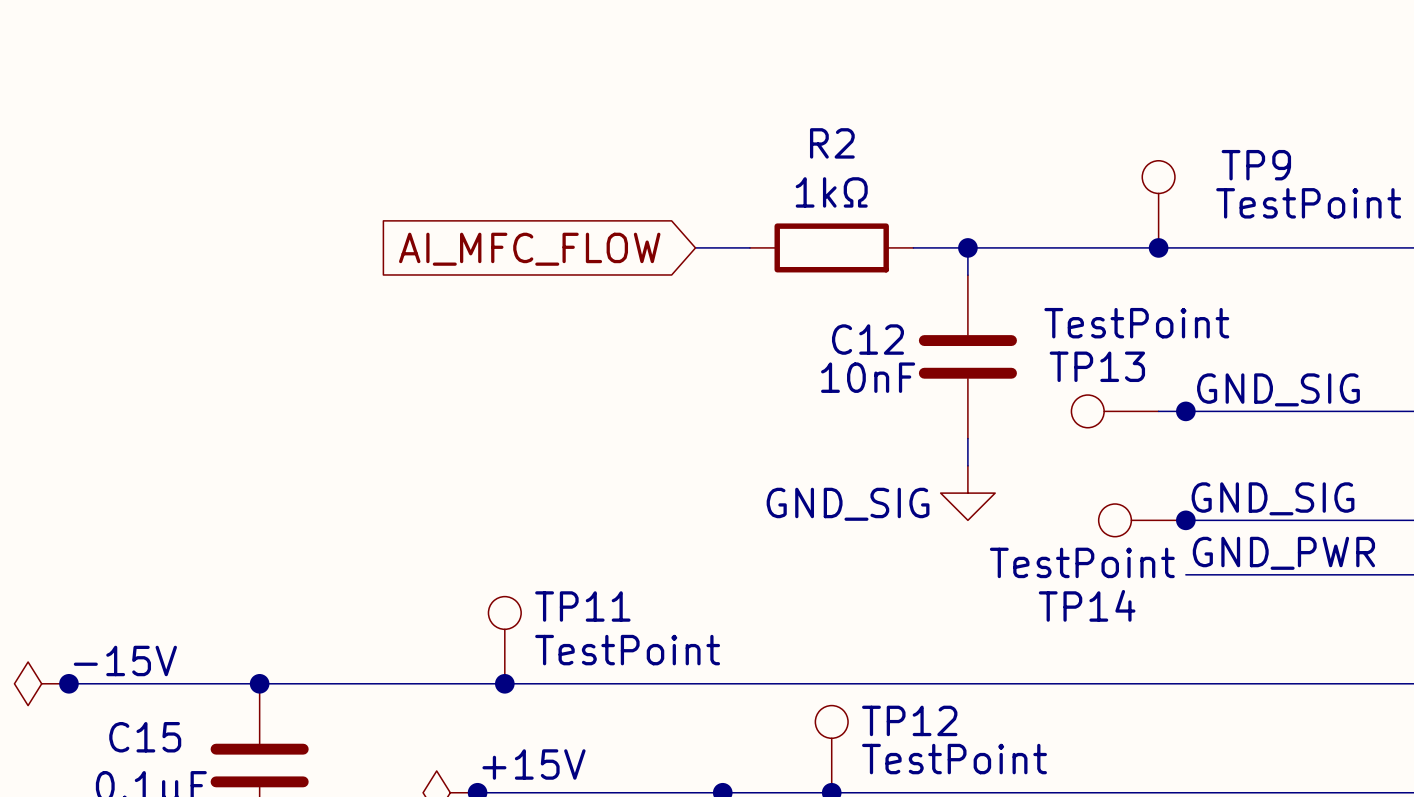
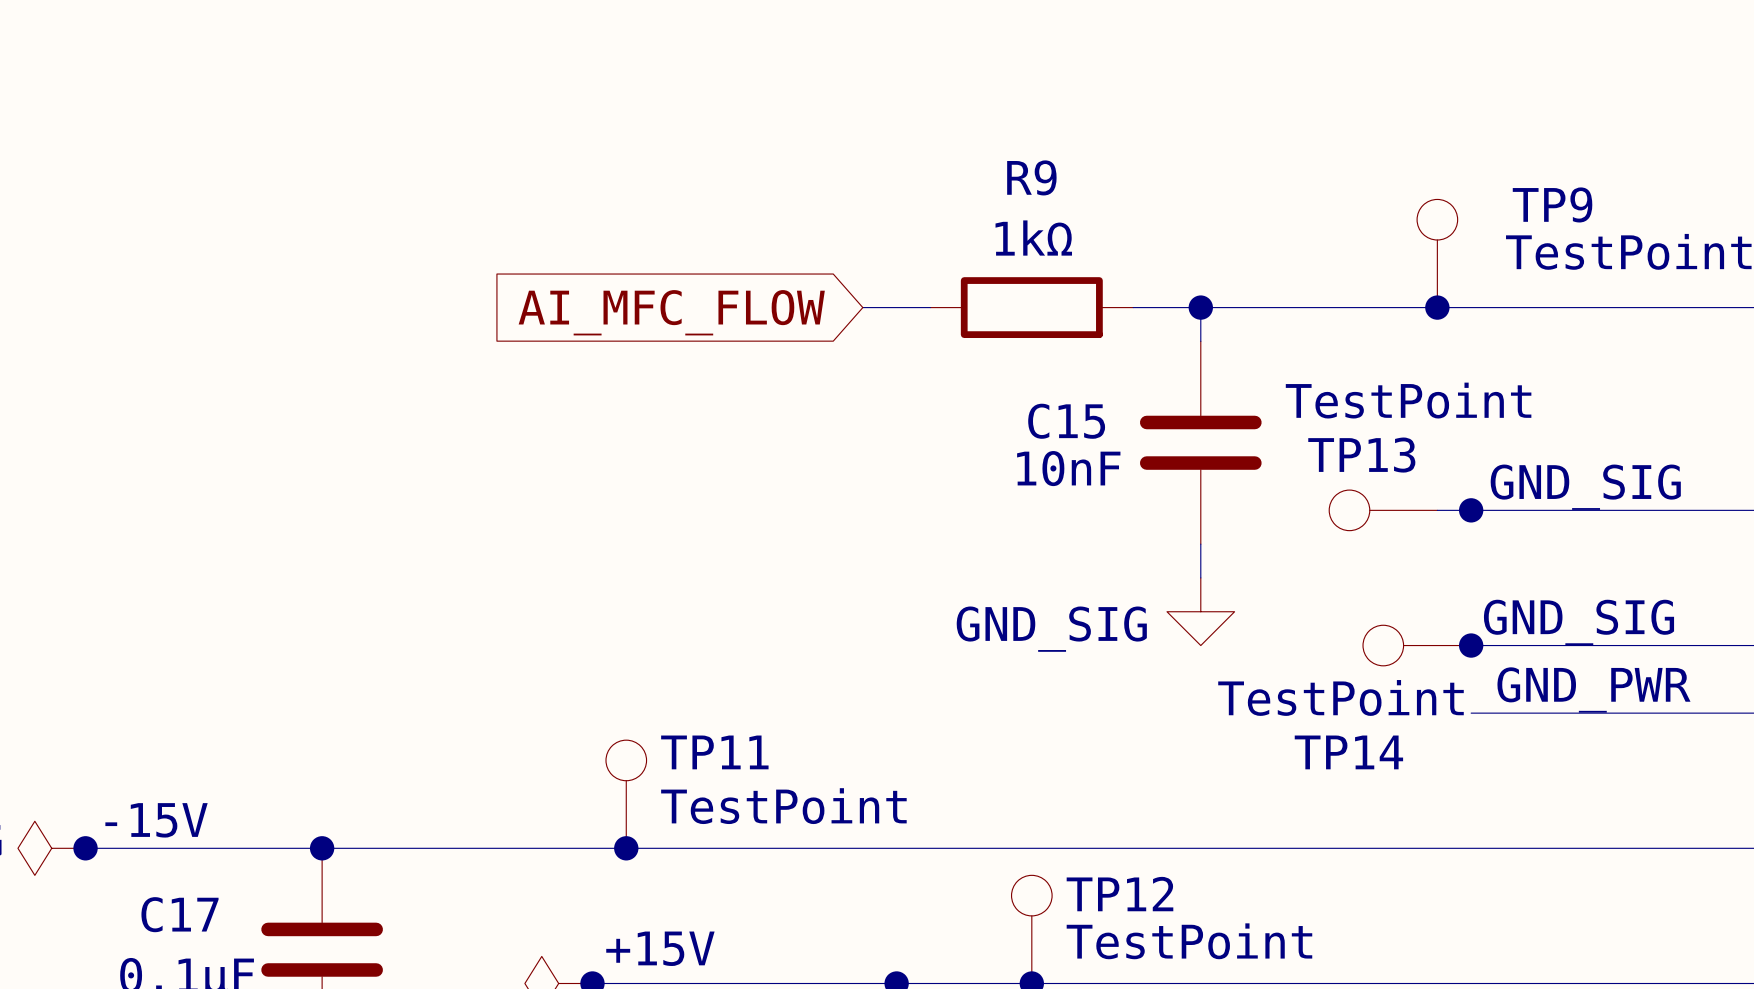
R2 name: R2 (832, 143) -> R9 (1031, 177)
C12 name: C12 (867, 339) -> C15 (1066, 421)
C15 name: C15 (145, 737) -> C17 (180, 914)

